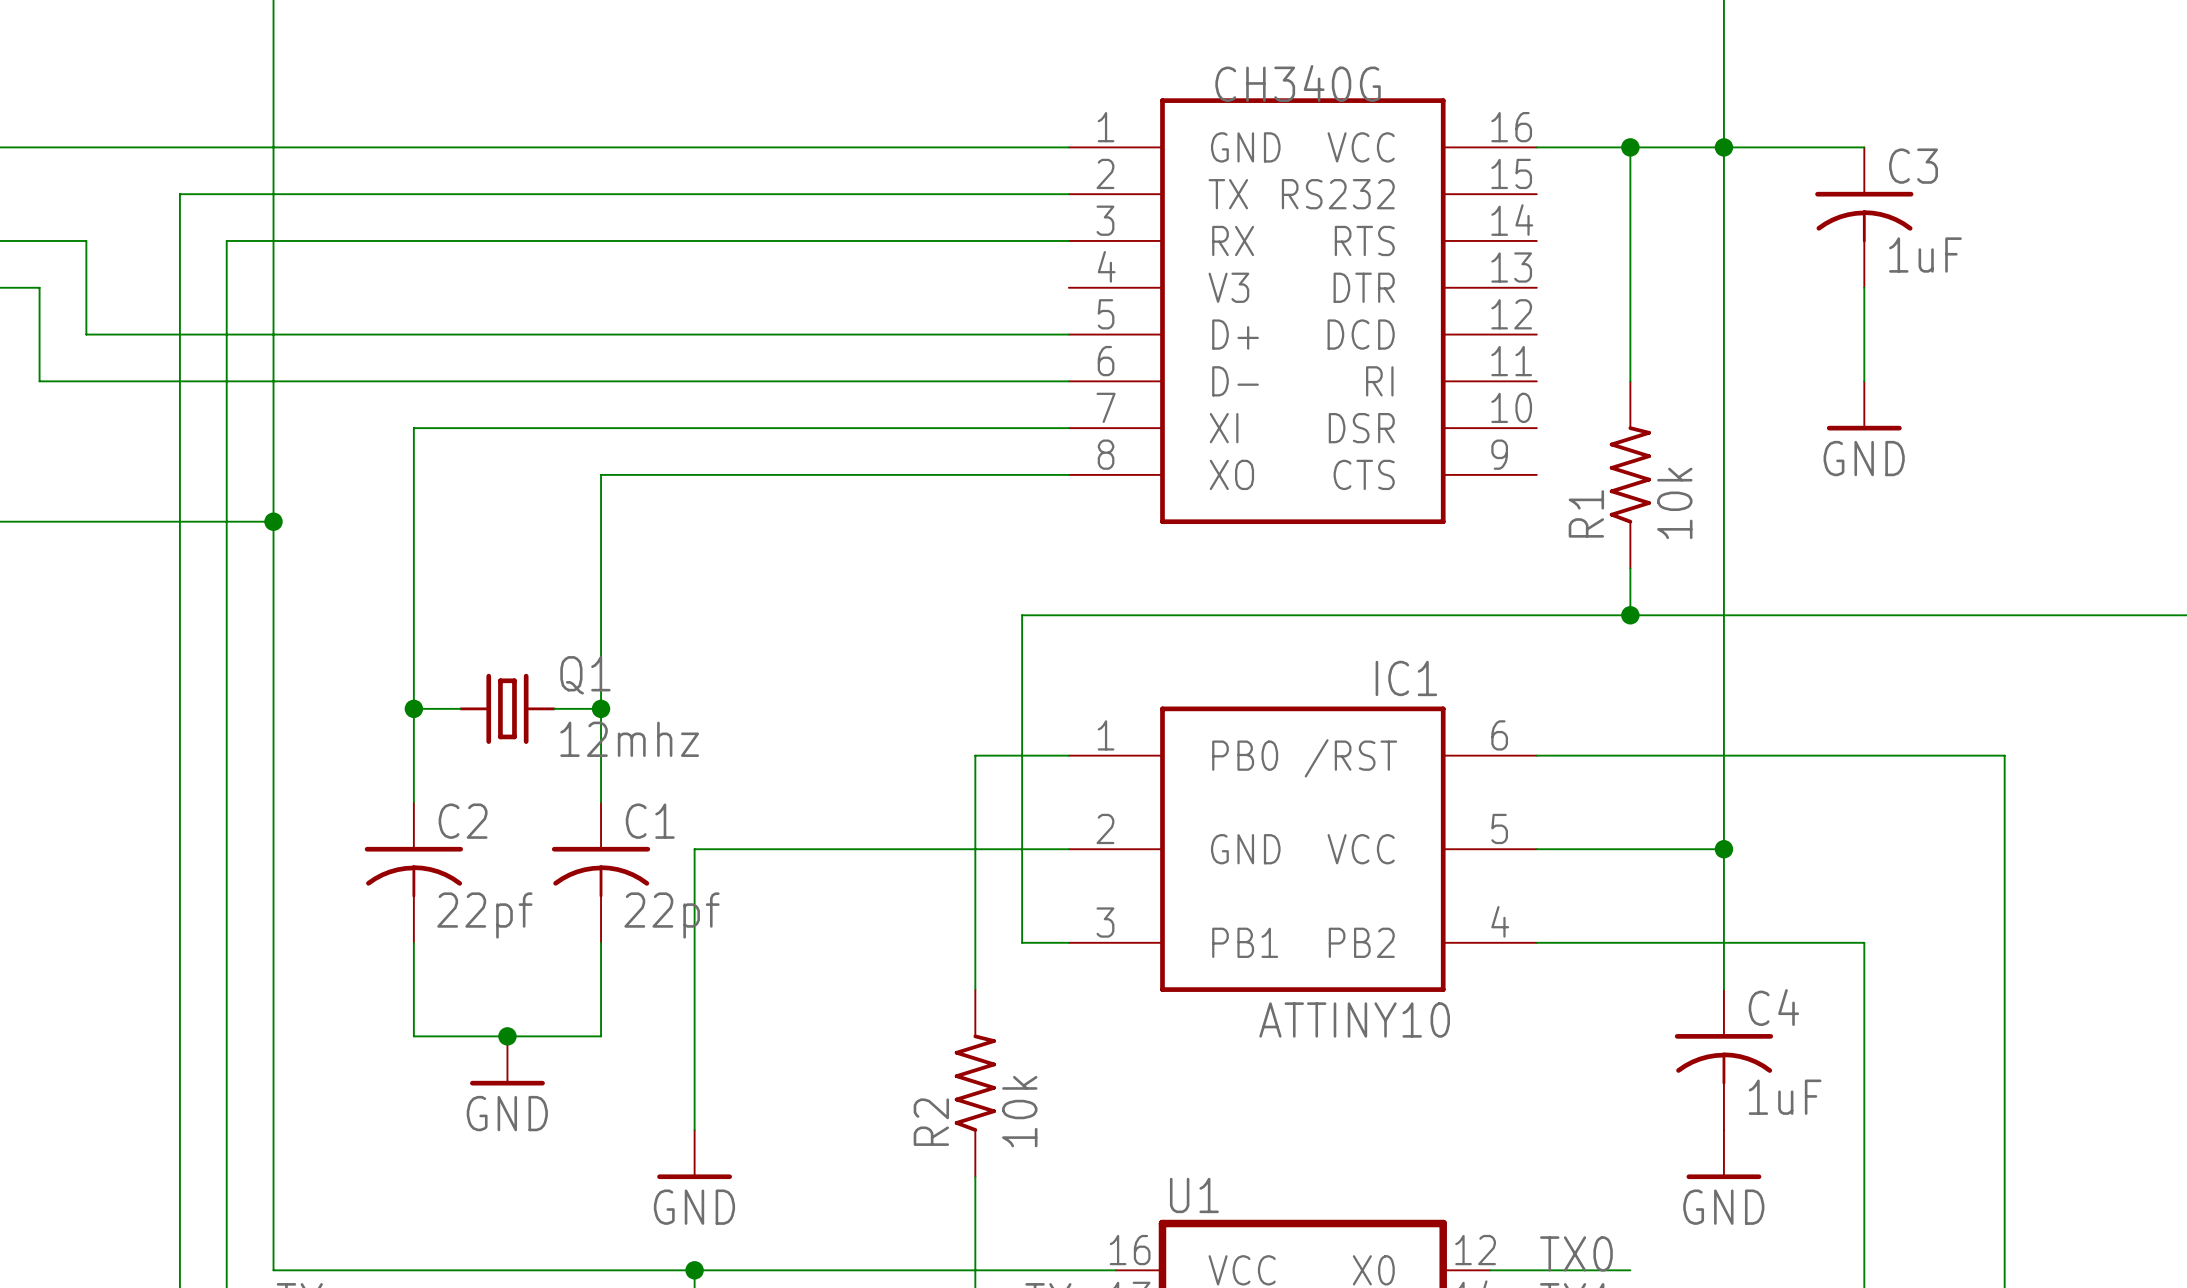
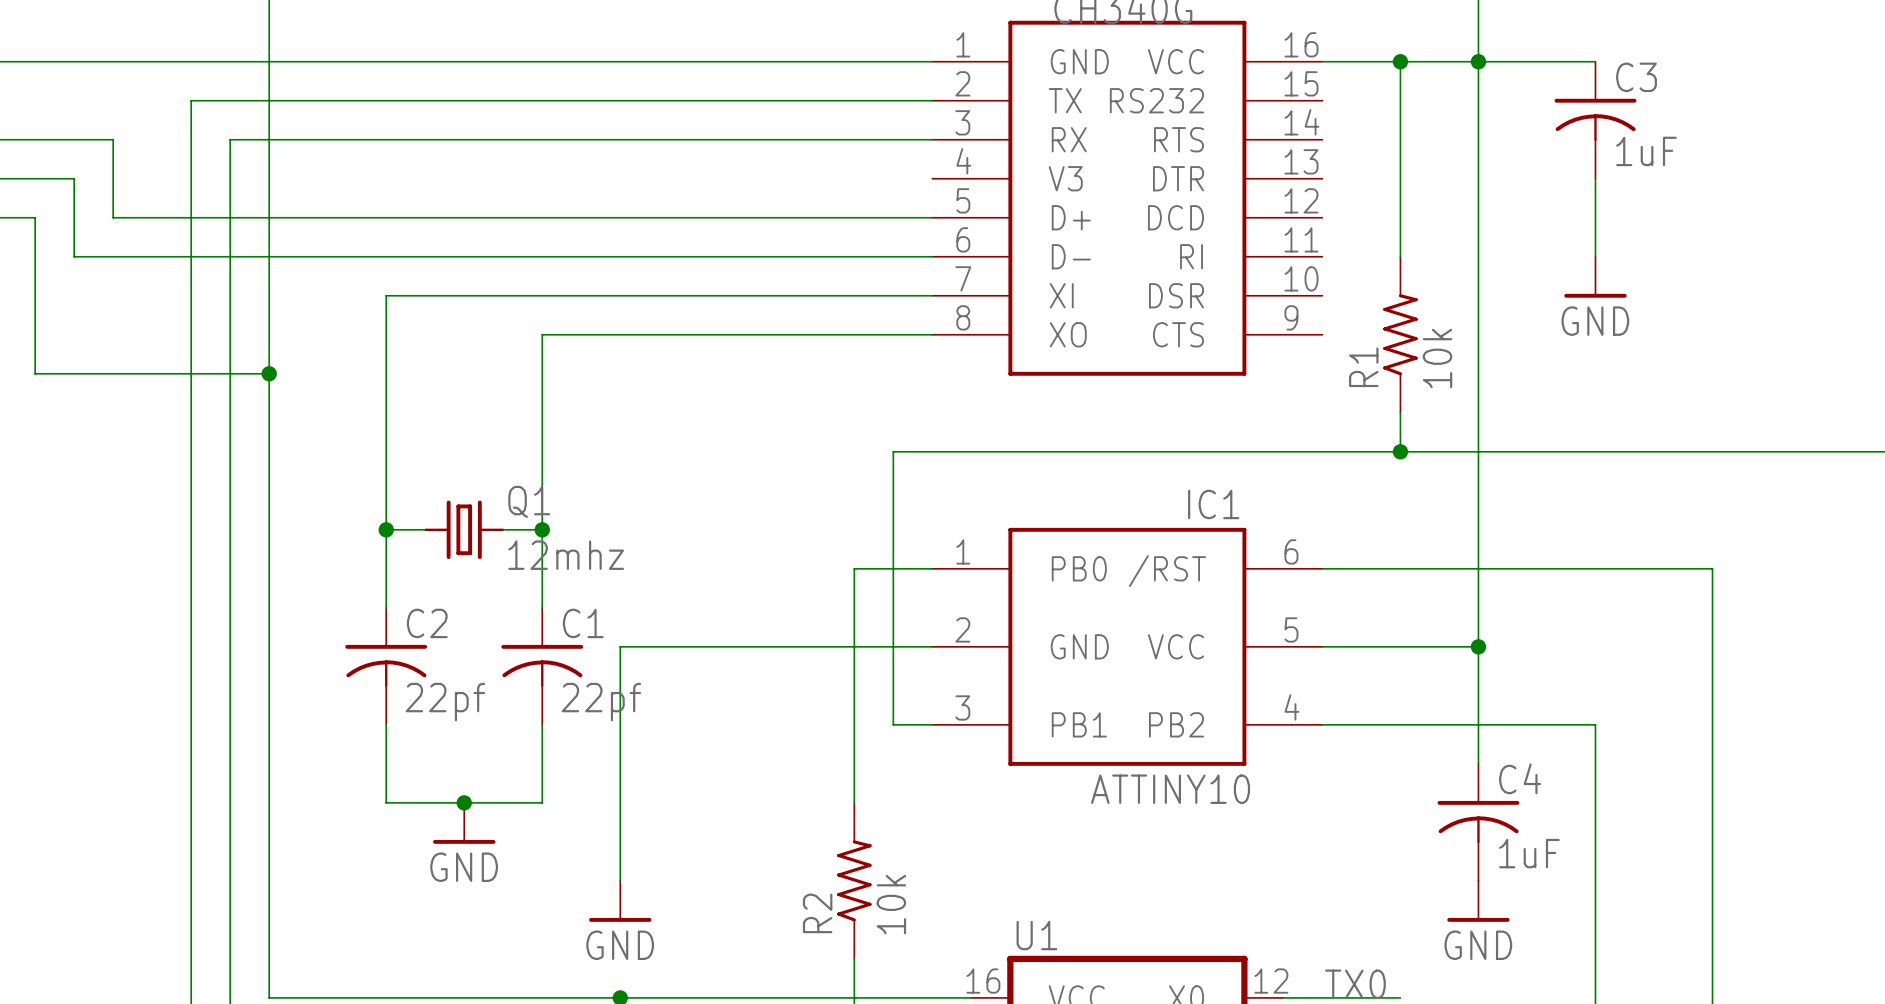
R2 position: (975, 1083) -> (854, 880)

